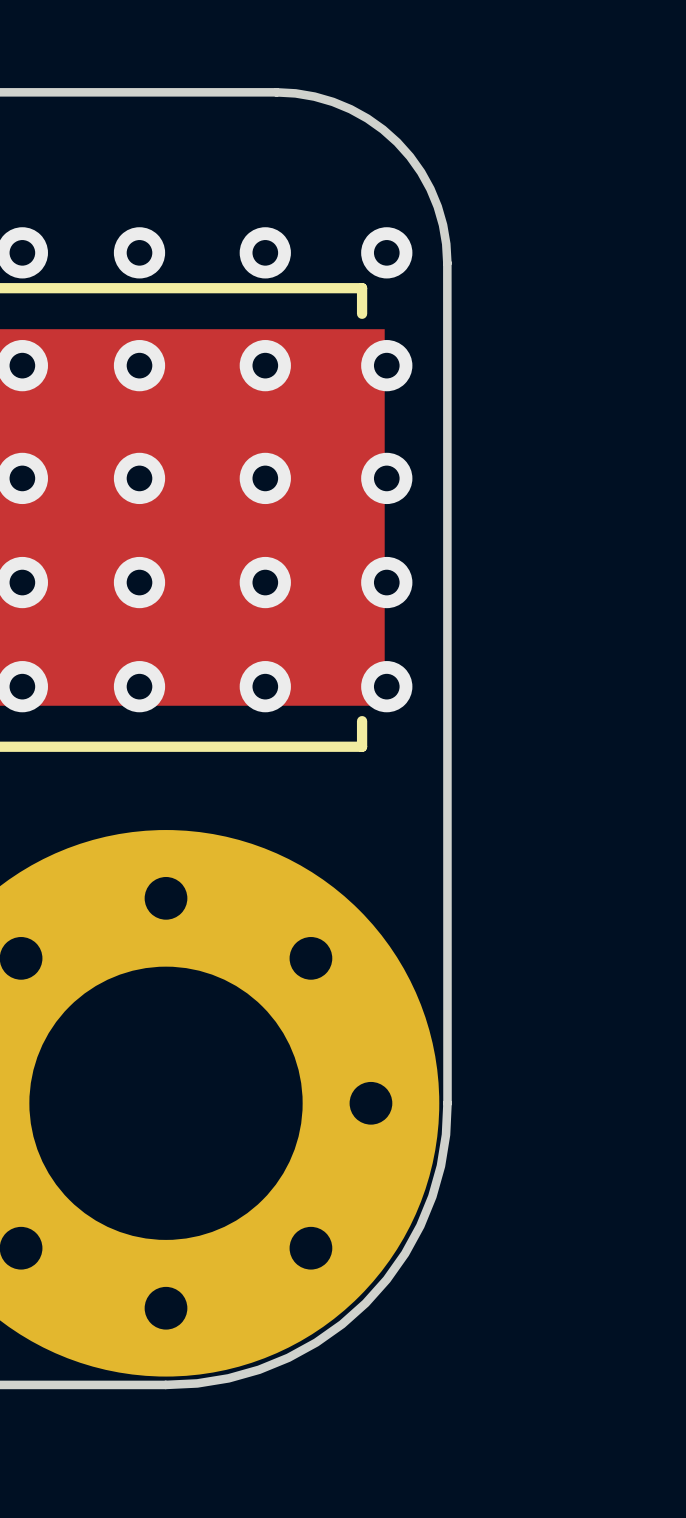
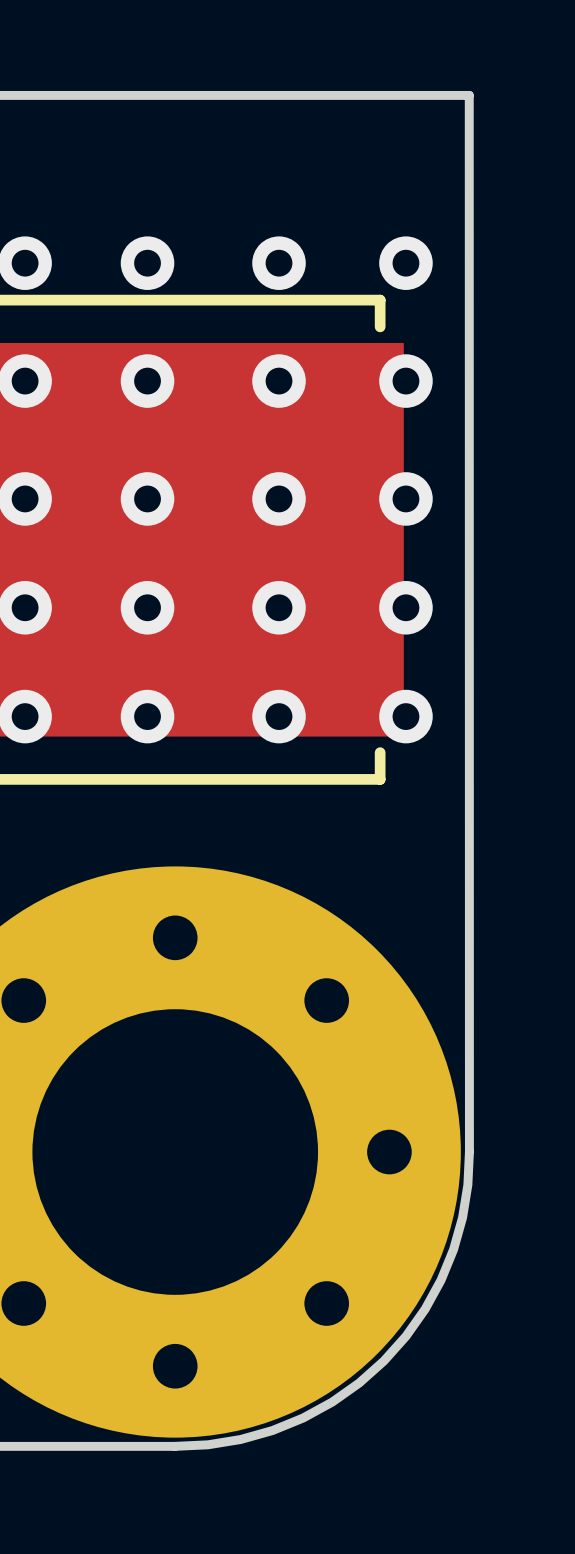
board edge: (276, 92) (295, 93) (332, 101) (350, 109) (383, 129) (410, 156) (430, 189) (437, 206) (446, 244) (447, 1103) -> (290, 95) (469, 95) (469, 1151)

